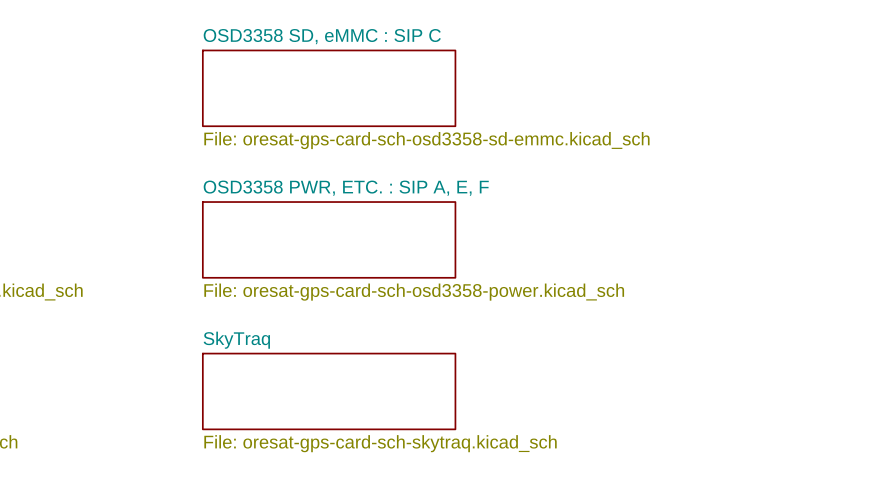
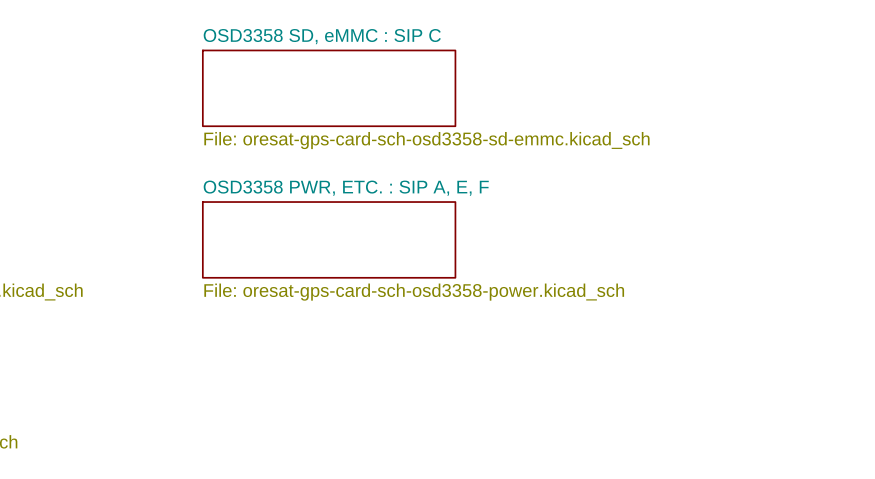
sheet SkyTraq: File: oresat-gps-card-sch-skytraq.kicad_sch (329, 391) -> none

